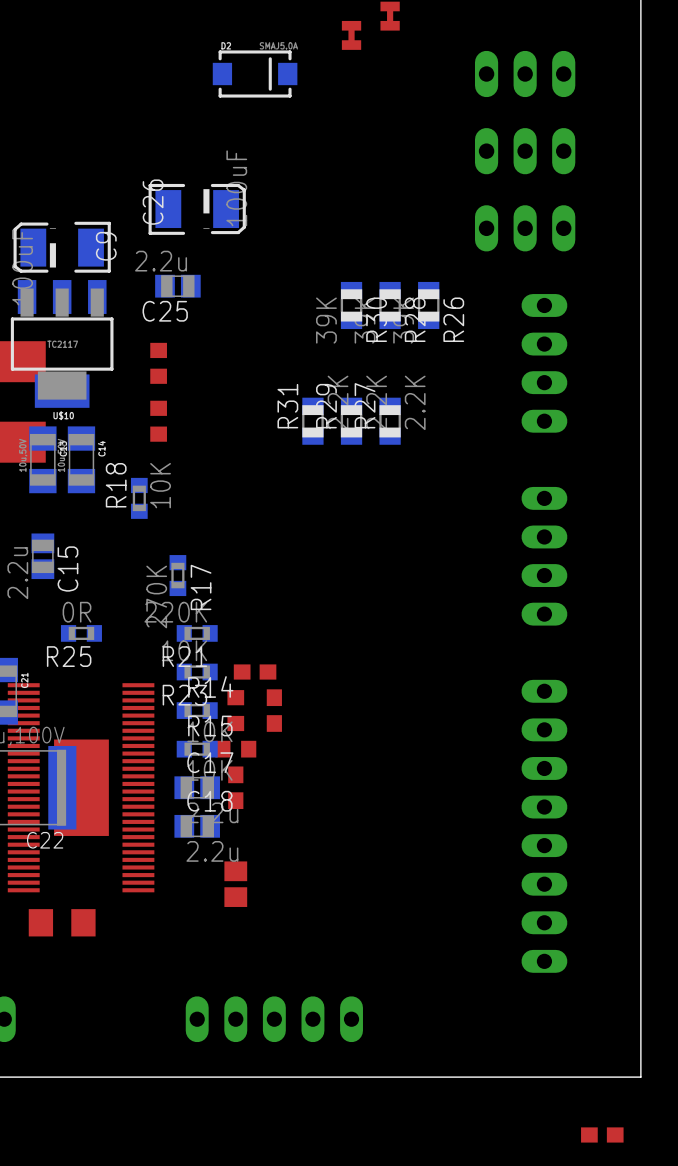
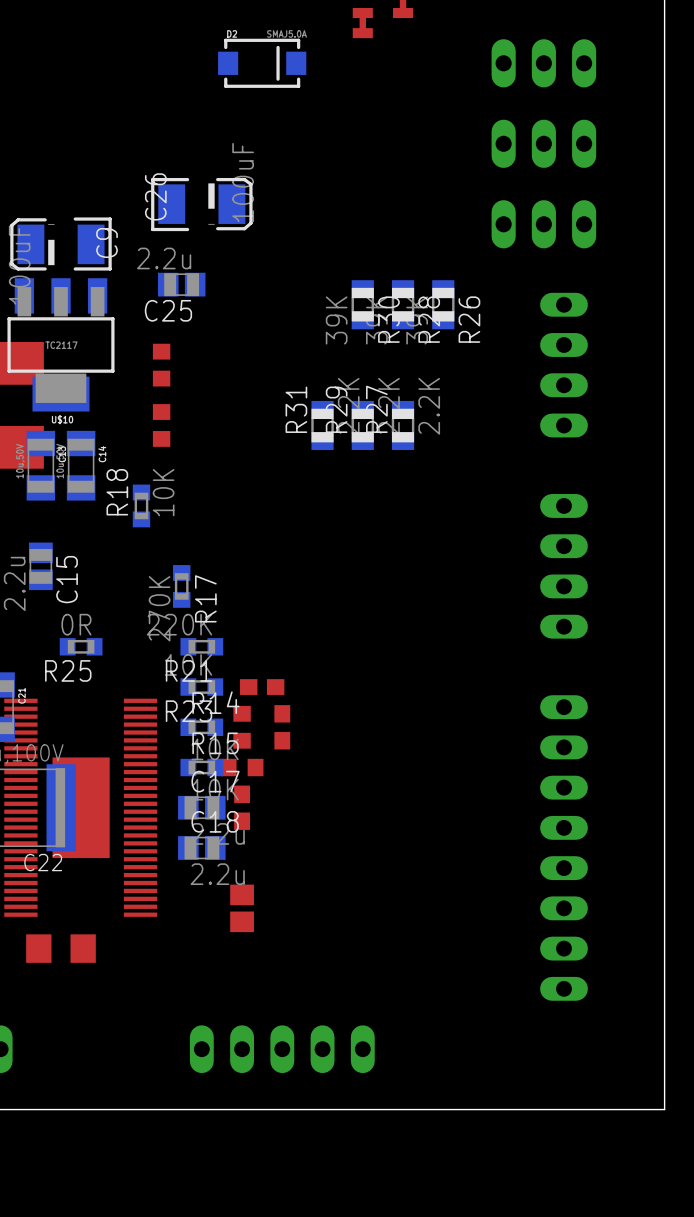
part: (602, 1134) -> none

